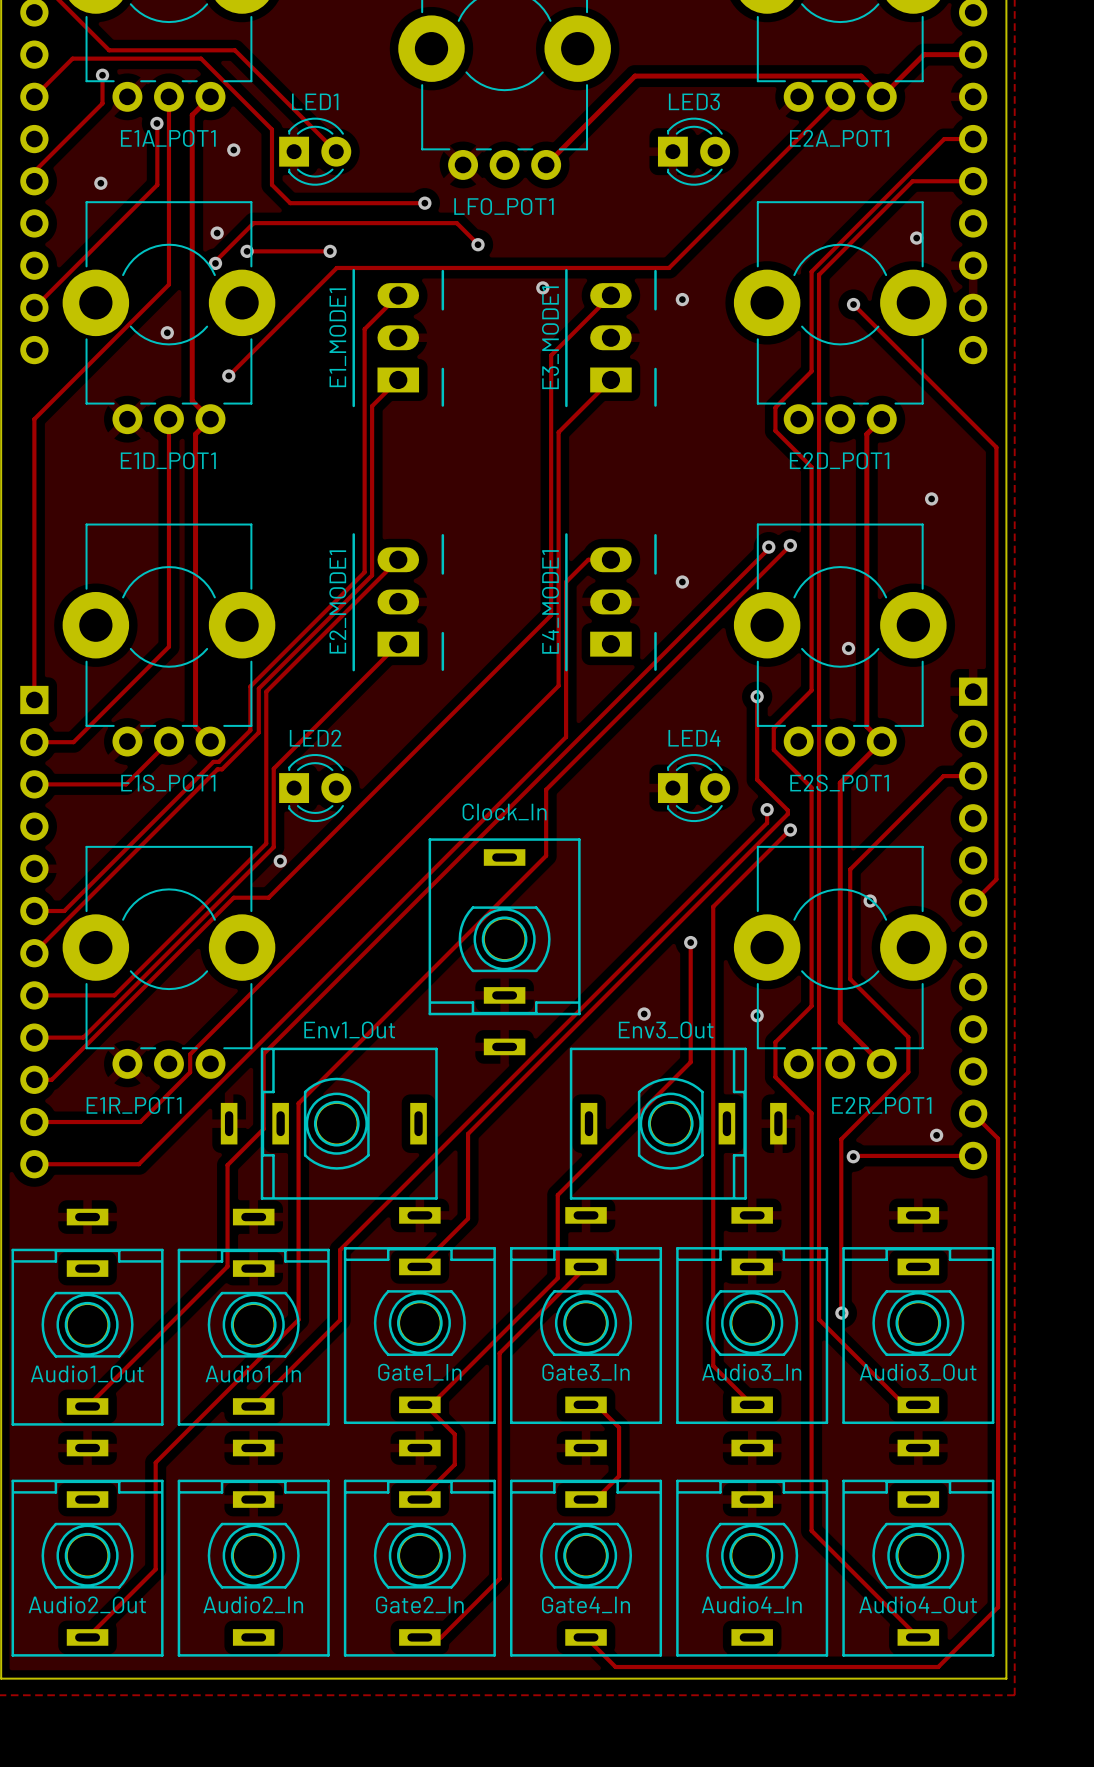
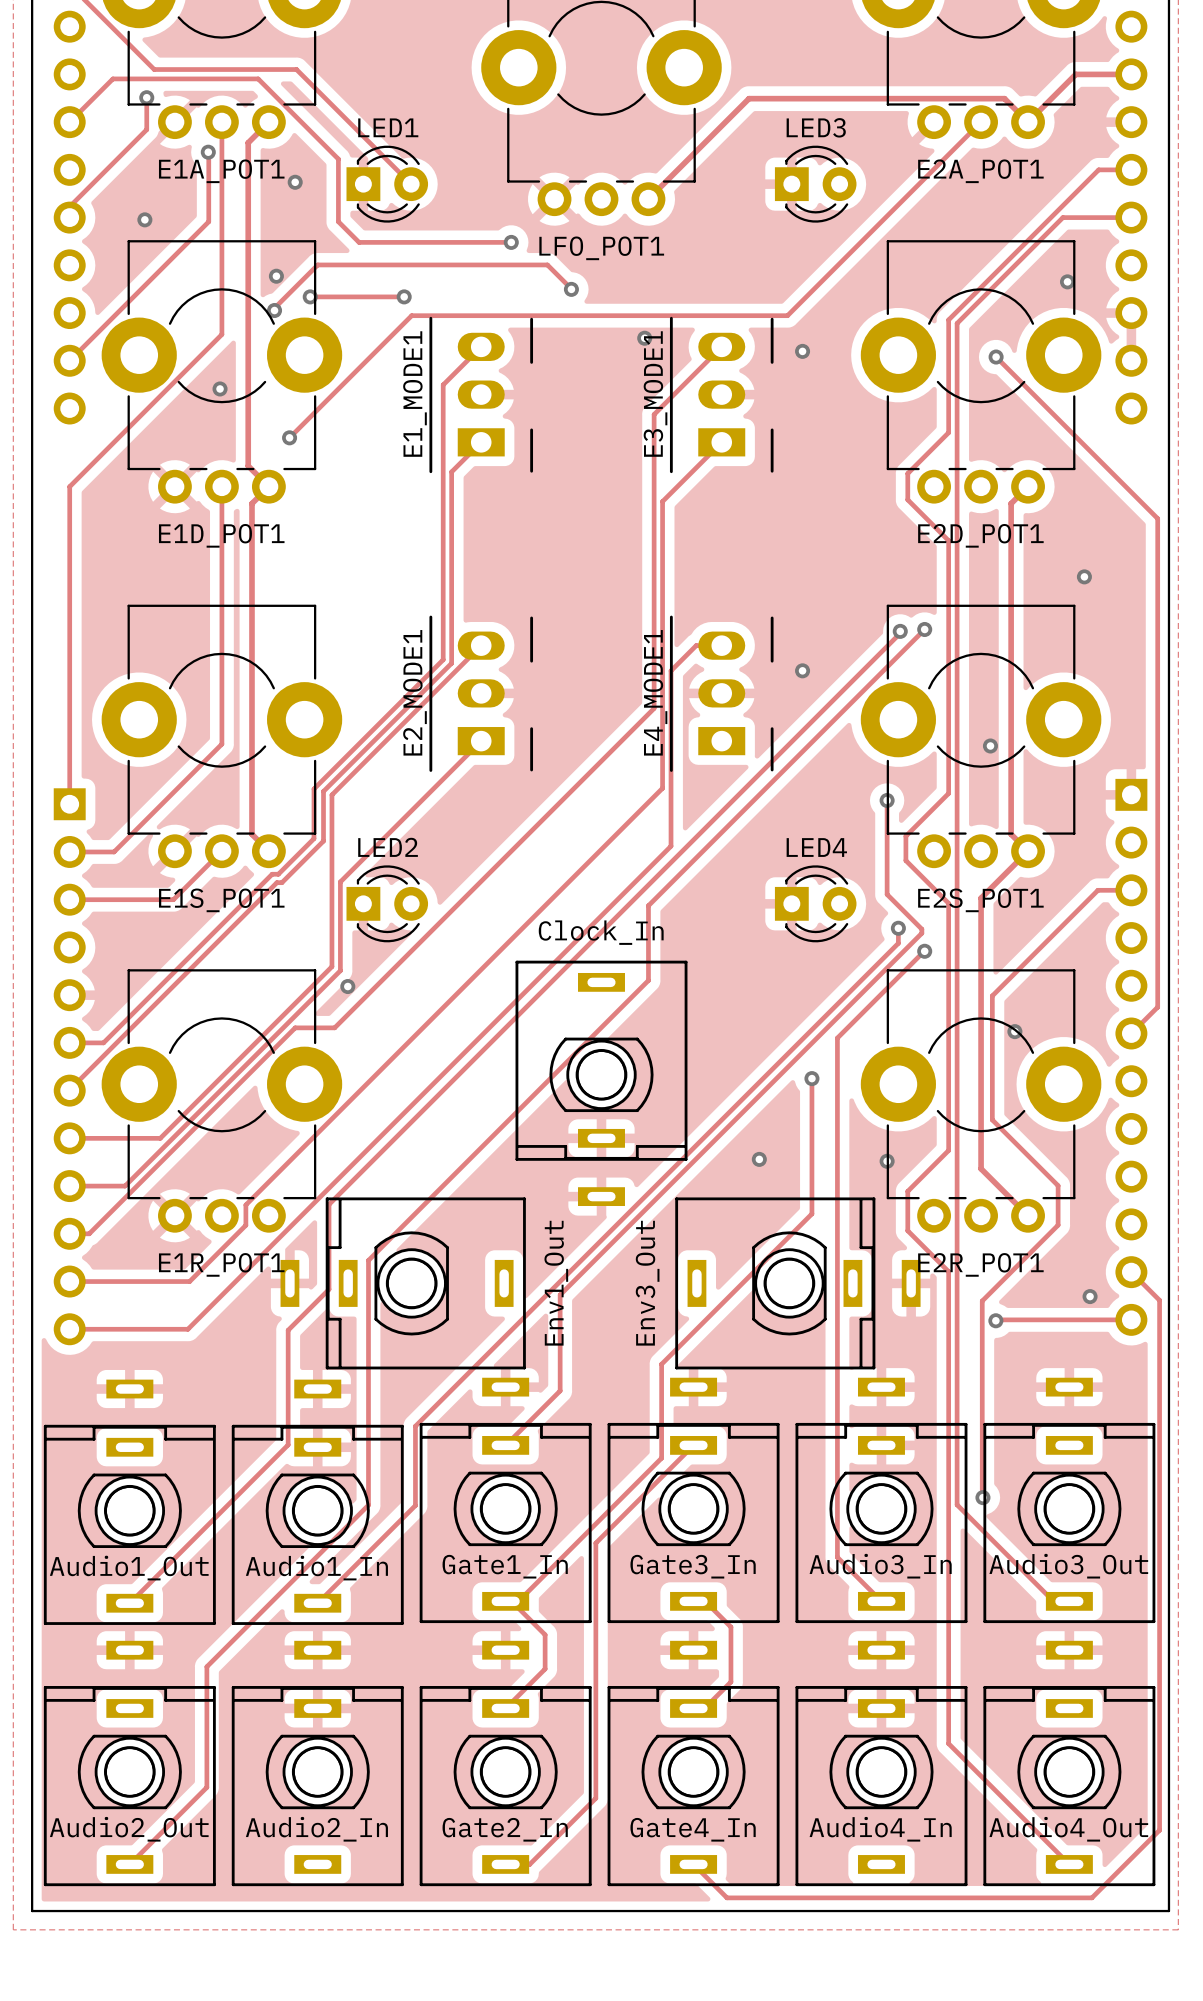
part value rotation: 0° (349, 1030) -> 90° counterclockwise (556, 1283)
part value position: Env1_Out (349, 1030) -> Env1_Out (556, 1283)
part value rotation: 0° (666, 1030) -> 90° counterclockwise (647, 1283)
part value position: Env3_Out (666, 1030) -> Env3_Out (647, 1283)
E1R_POT1 name position: E1R_POT1 (134, 1105) -> E1R_POT1 (221, 1264)
E2R_POT1 name position: E2R_POT1 (881, 1105) -> E2R_POT1 (980, 1264)

